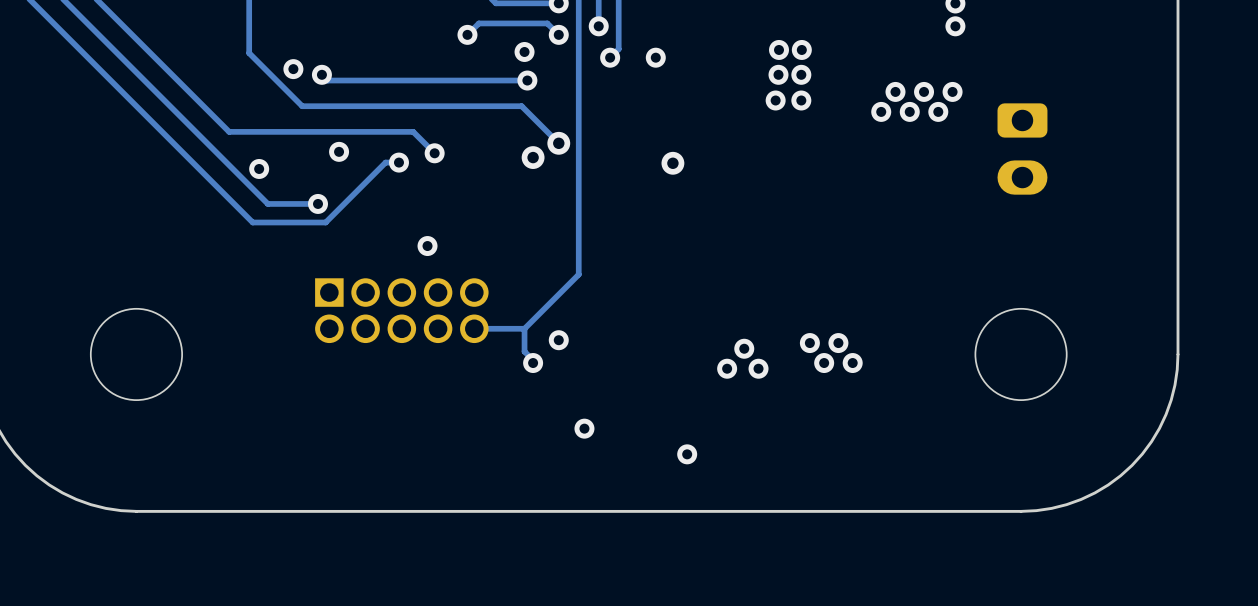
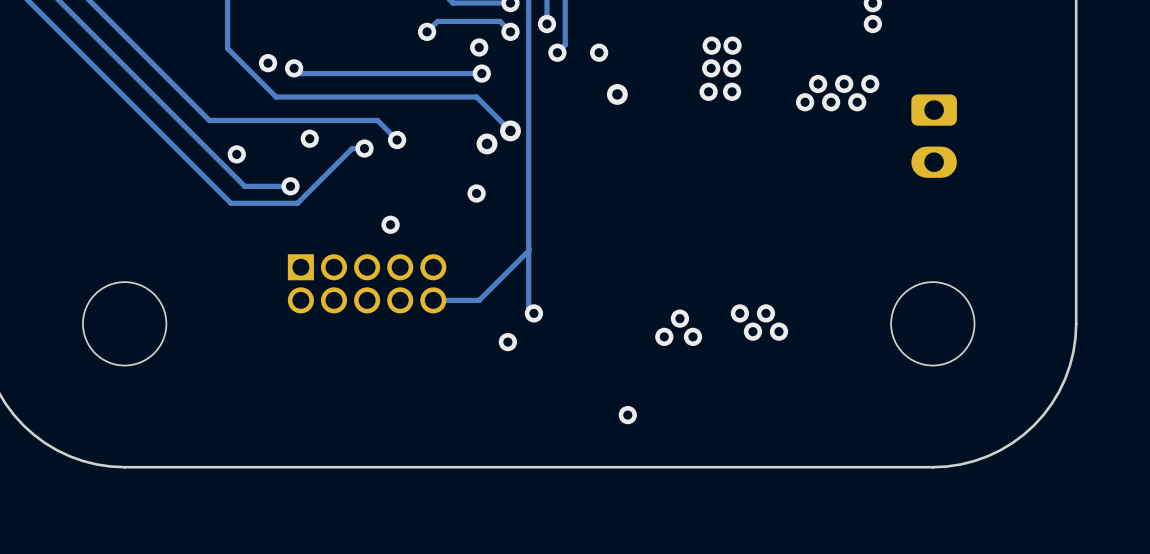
via position: (672, 163) -> (617, 94)
via: none -> (476, 193)
track: none -> (528, 250) (528, 308) (533, 313)
track: (524, 328) (524, 351) (533, 360) -> none
via: (558, 340) -> none
via: none -> (533, 313)
via: (533, 363) -> none
via: none -> (507, 342)
via: (584, 428) -> none

